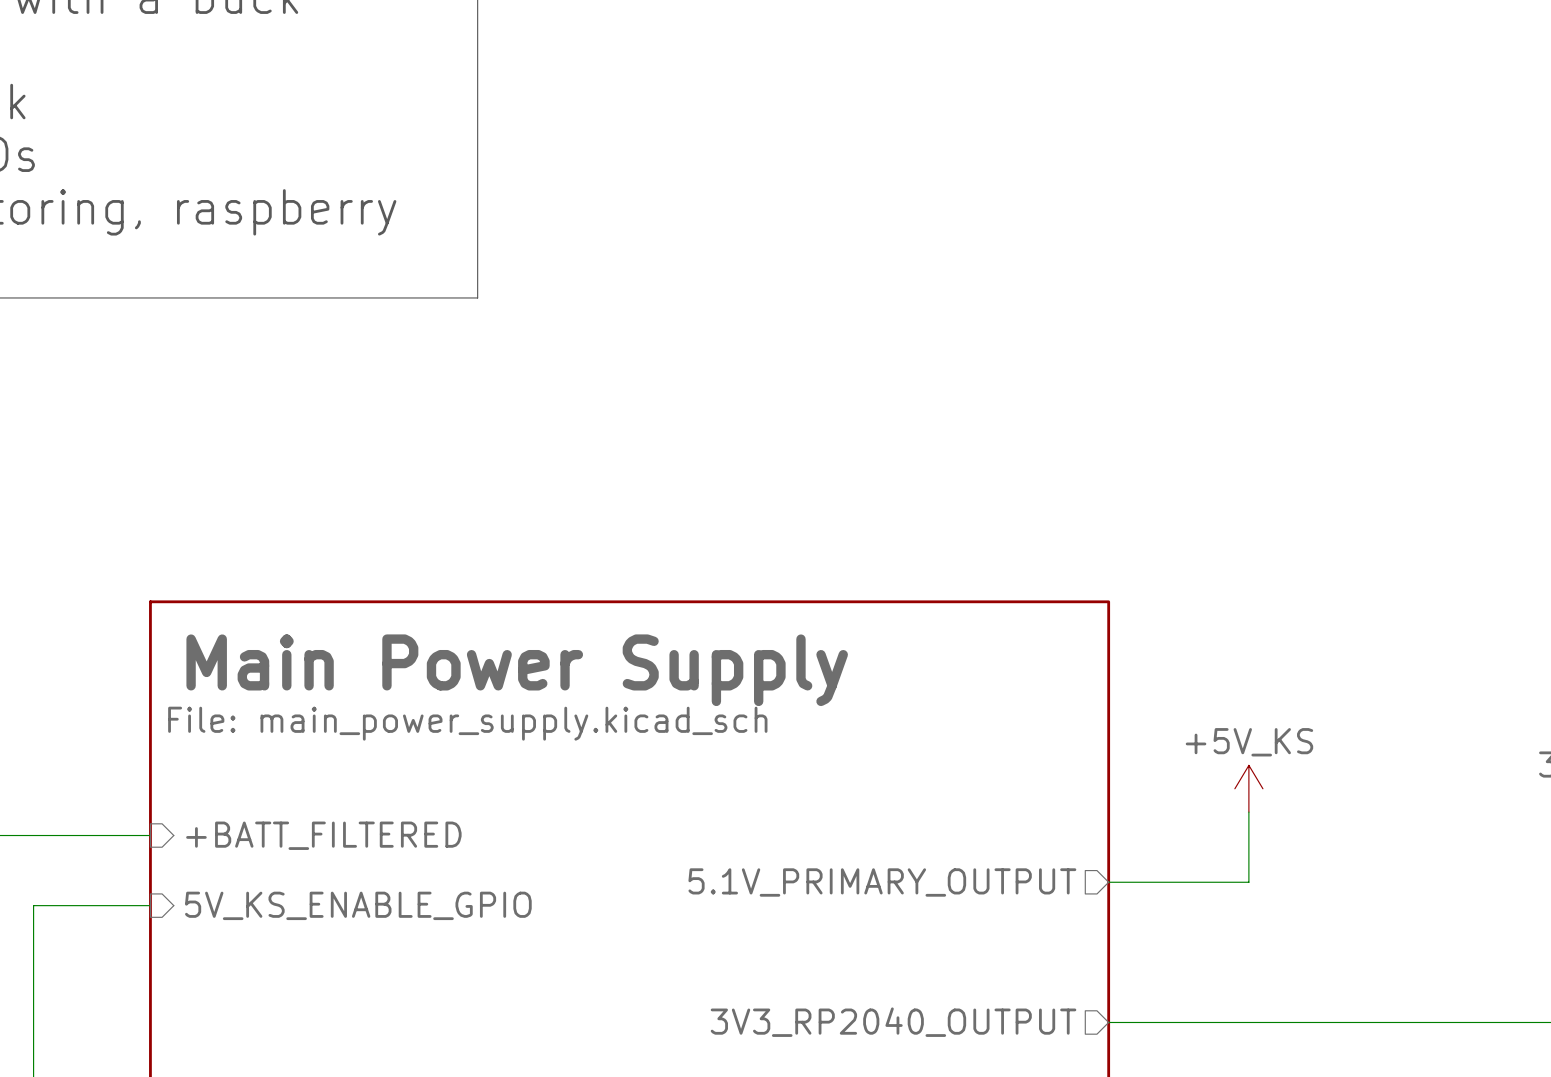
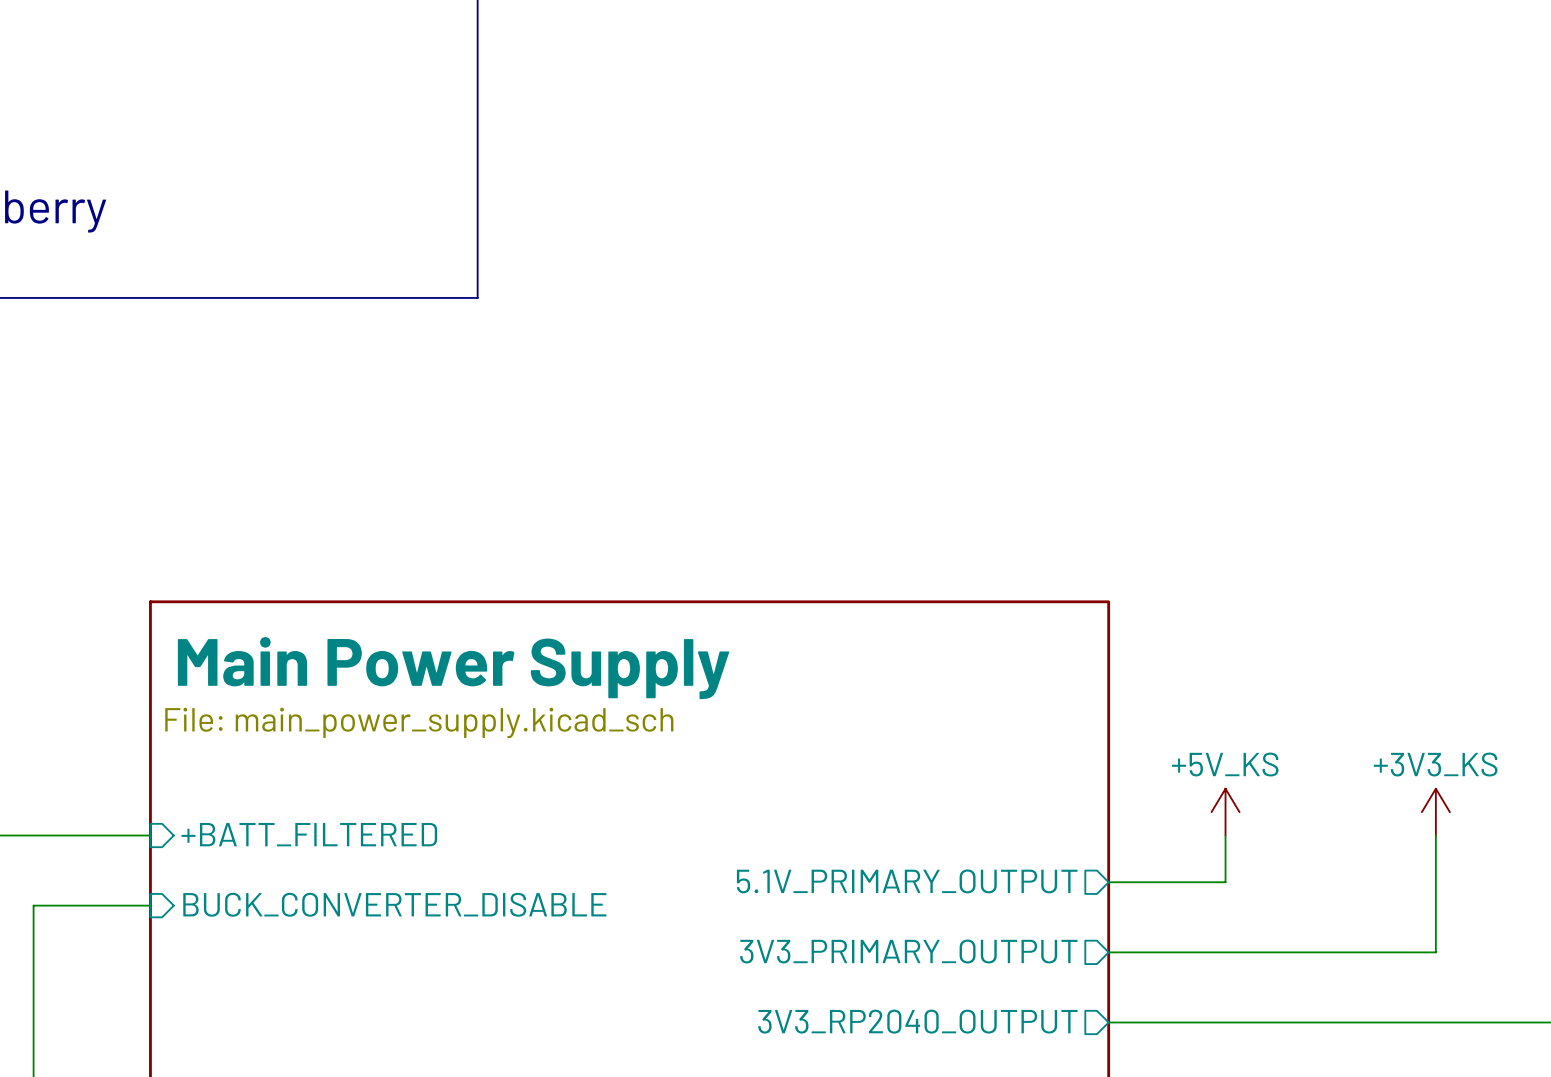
power symbol position: +5V_KS (1248, 788) -> +5V_KS (1225, 812)
wire: (1248, 812) (1248, 882) (1225, 882) -> (1225, 835) (1225, 882)
power symbol: none -> +3V3_KS (1435, 812)
wire: none -> (1435, 835) (1435, 952) (1108, 952)
sheet pin: 5V_KS_ENABLE_GPIO (358, 905) -> BUCK_CONVERTER_DISABLE (394, 904)
sheet pin: none -> 3V3_PRIMARY_OUTPUT (908, 951)

